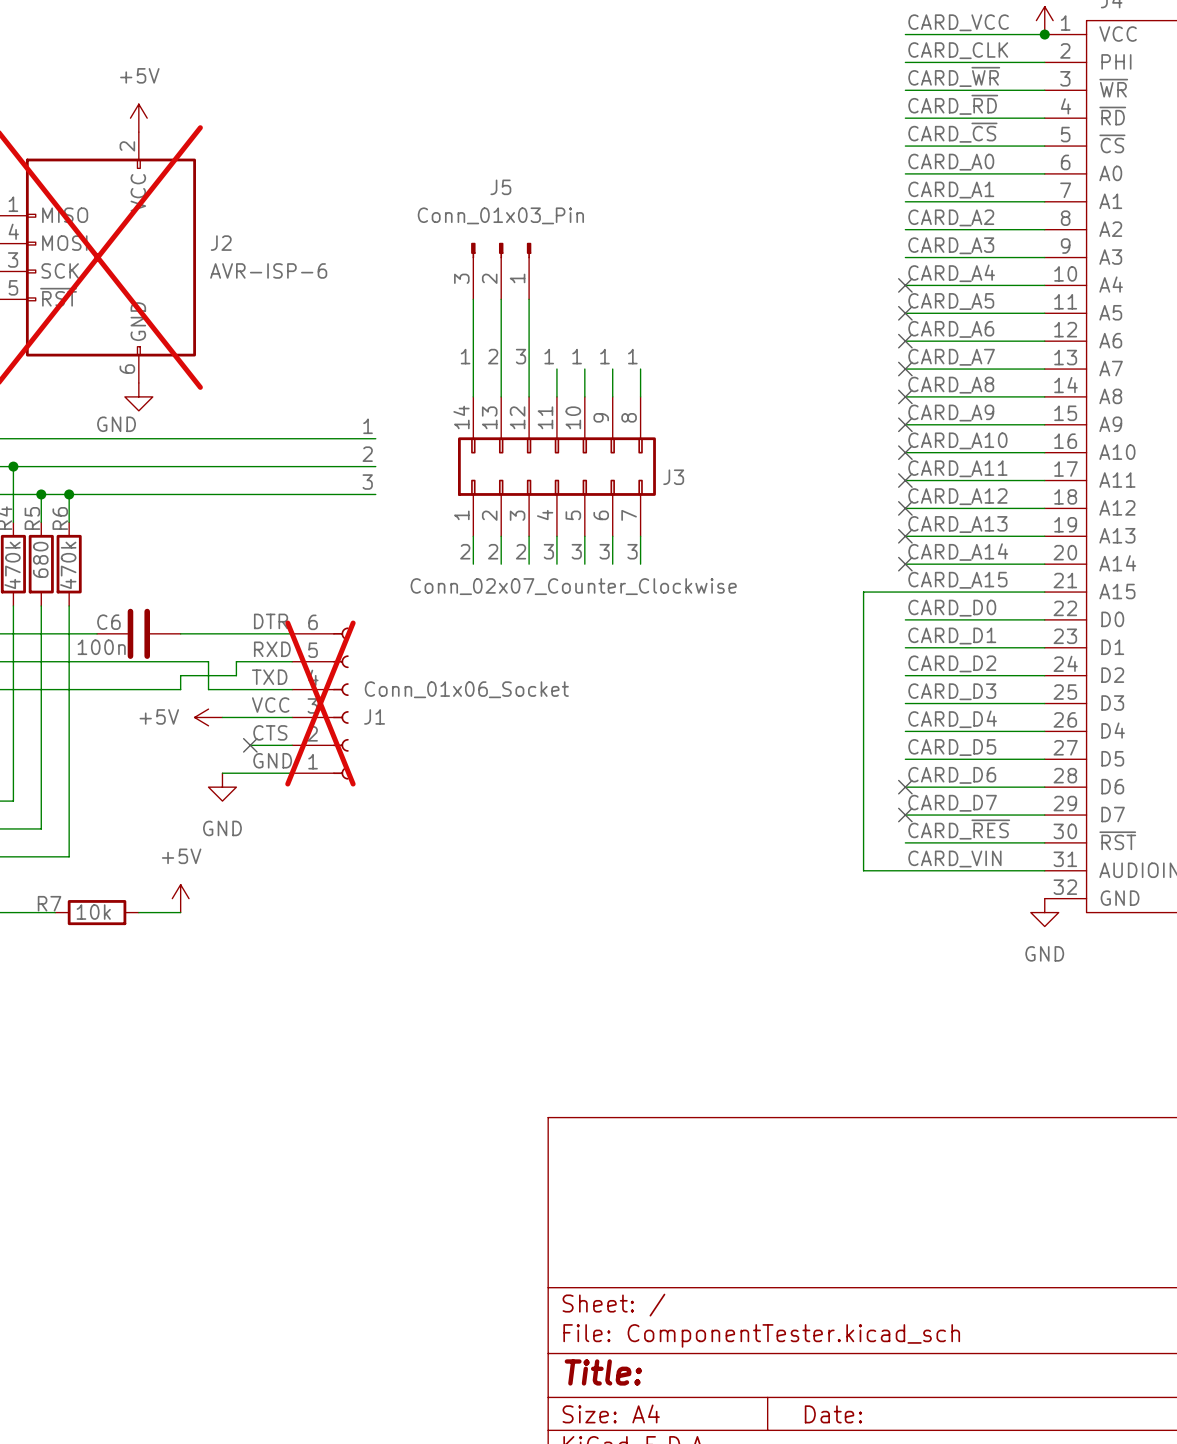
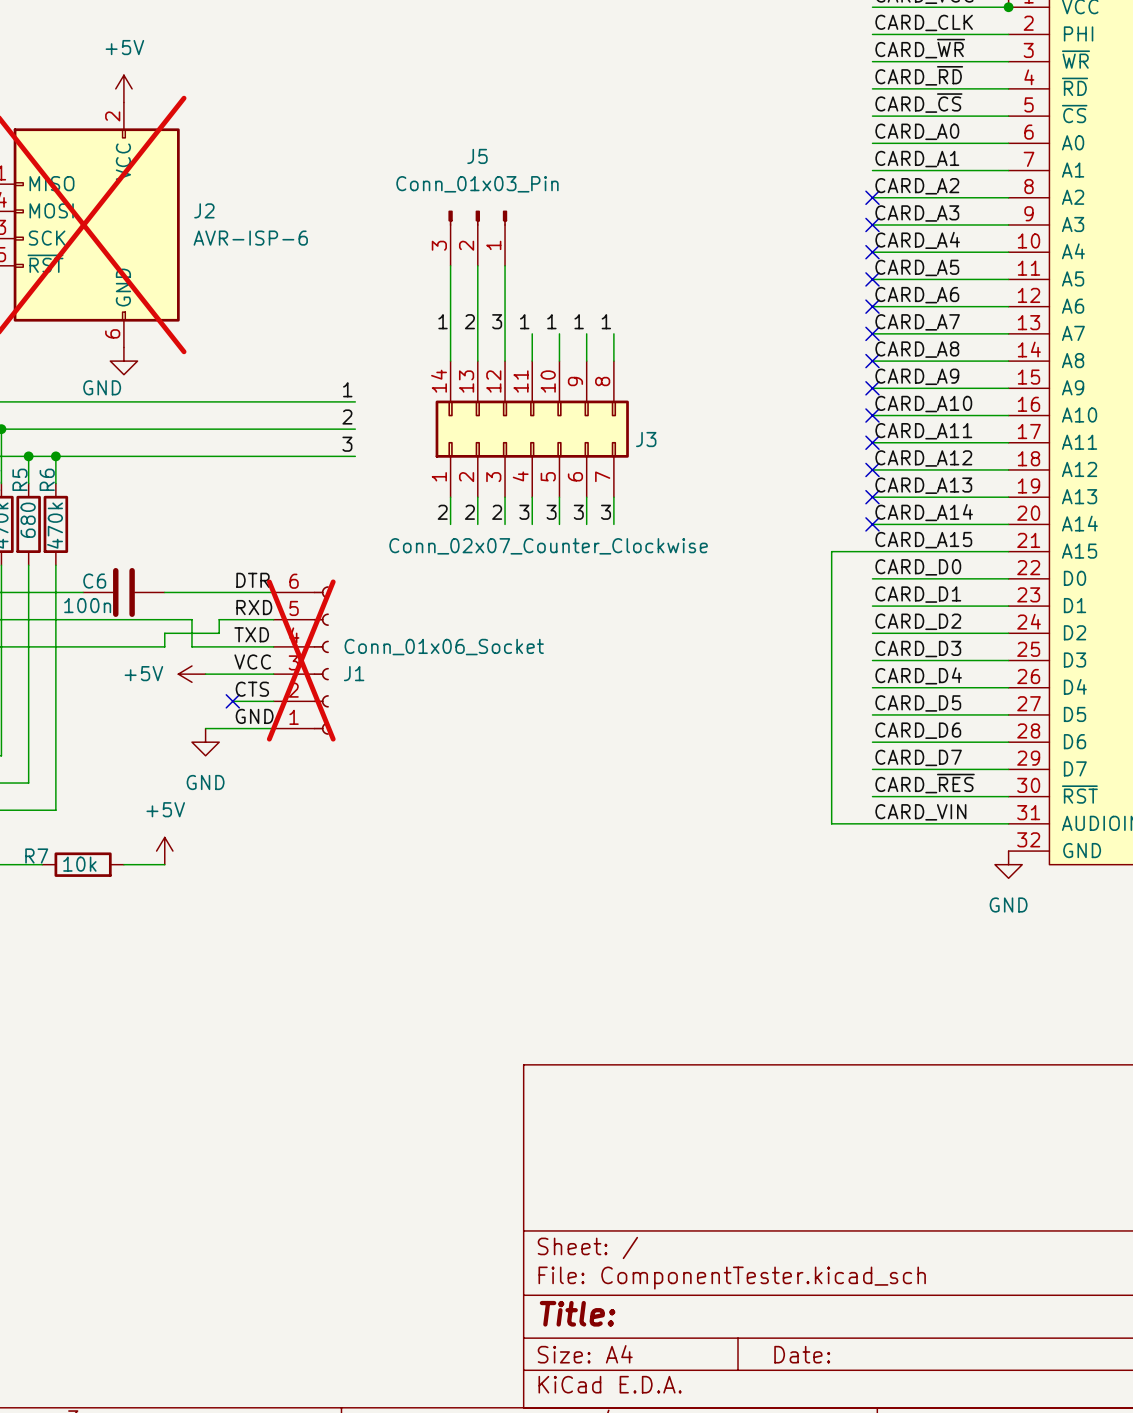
no-connect mark: none -> (872, 197)
no-connect mark: none -> (872, 224)
no-connect mark: (905, 787) -> none
no-connect mark: (905, 815) -> none

